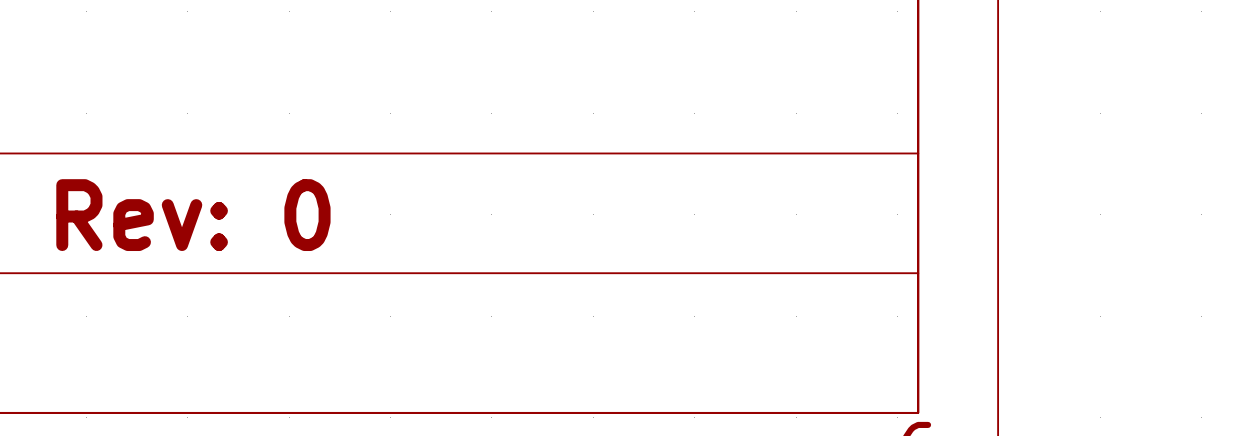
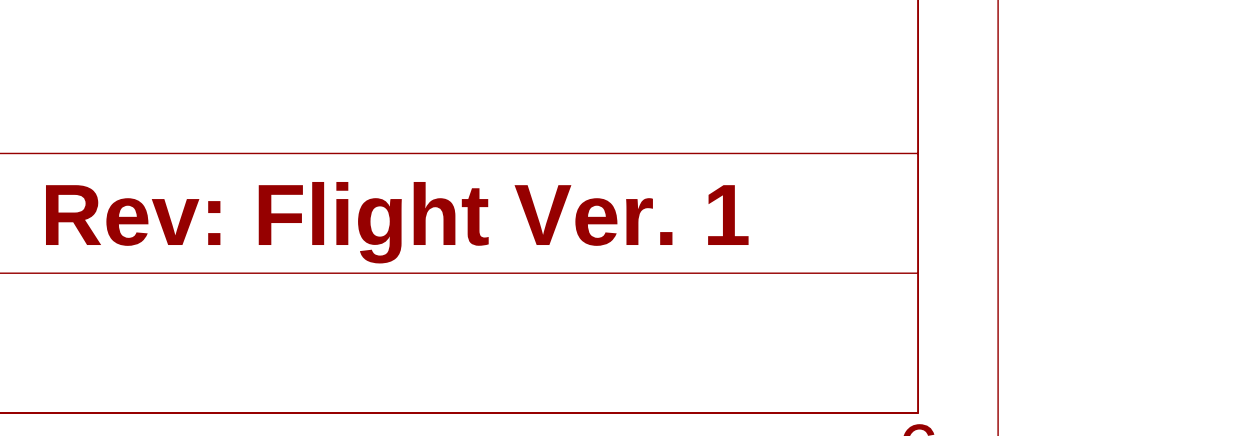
title block: Rev: 0 (193, 215) -> Rev: Flight Ver. 1 (397, 222)

